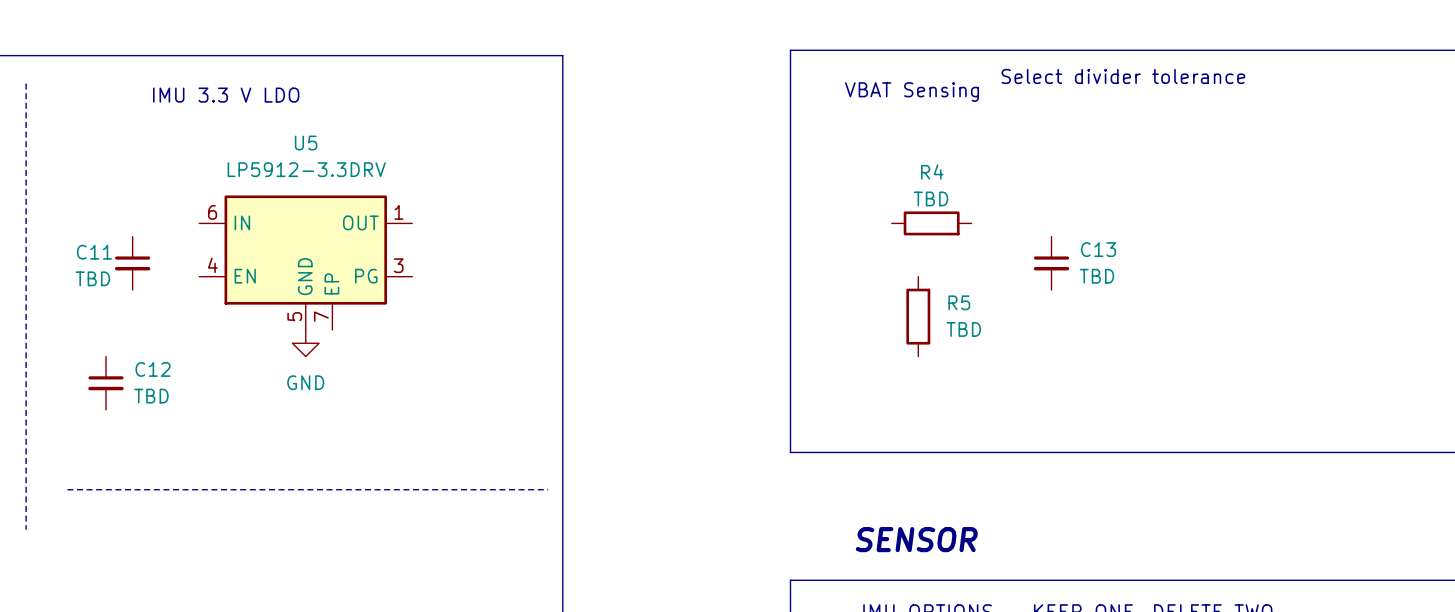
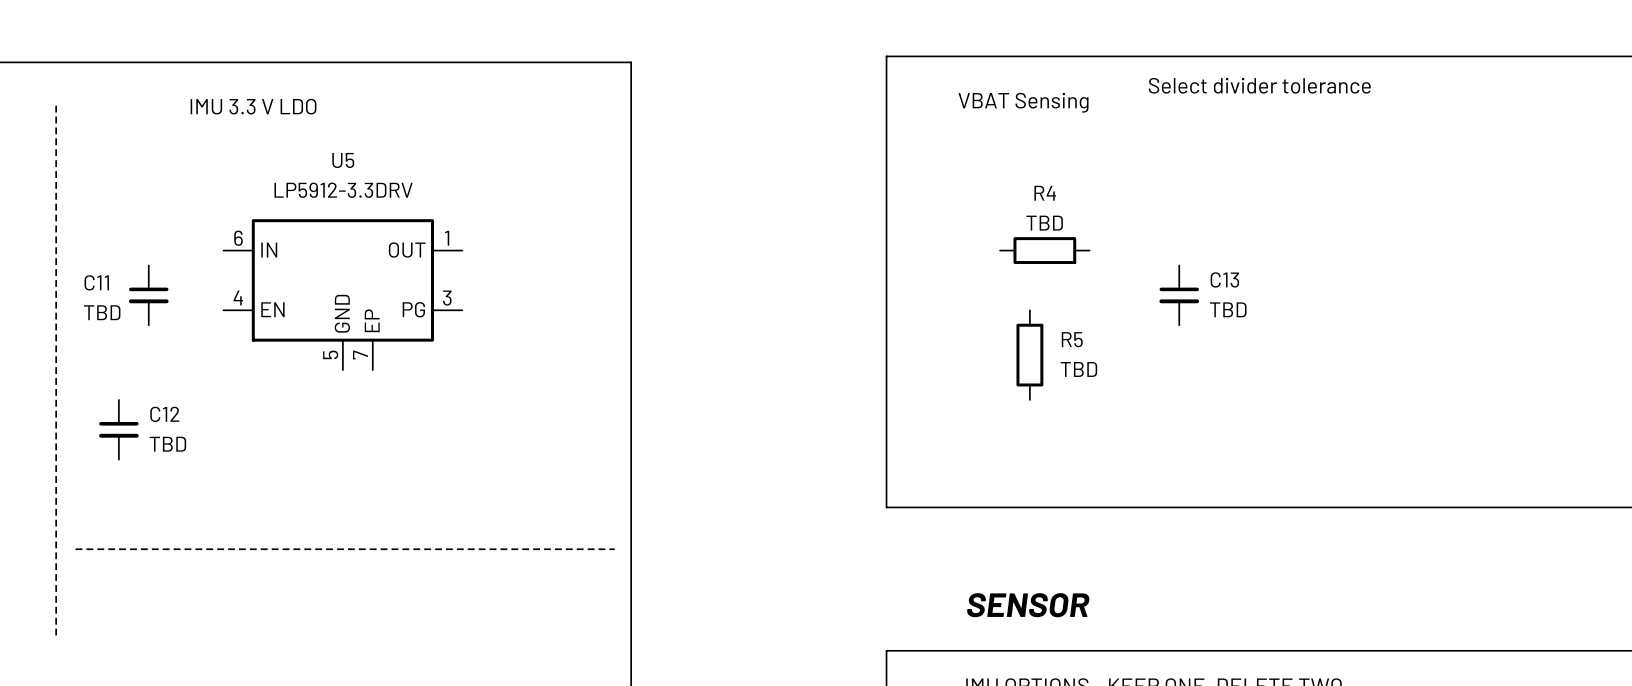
line: (26, 83) (26, 529) -> none
line: none -> (56, 105) (56, 635)
power symbol: GND (305, 343) -> none

